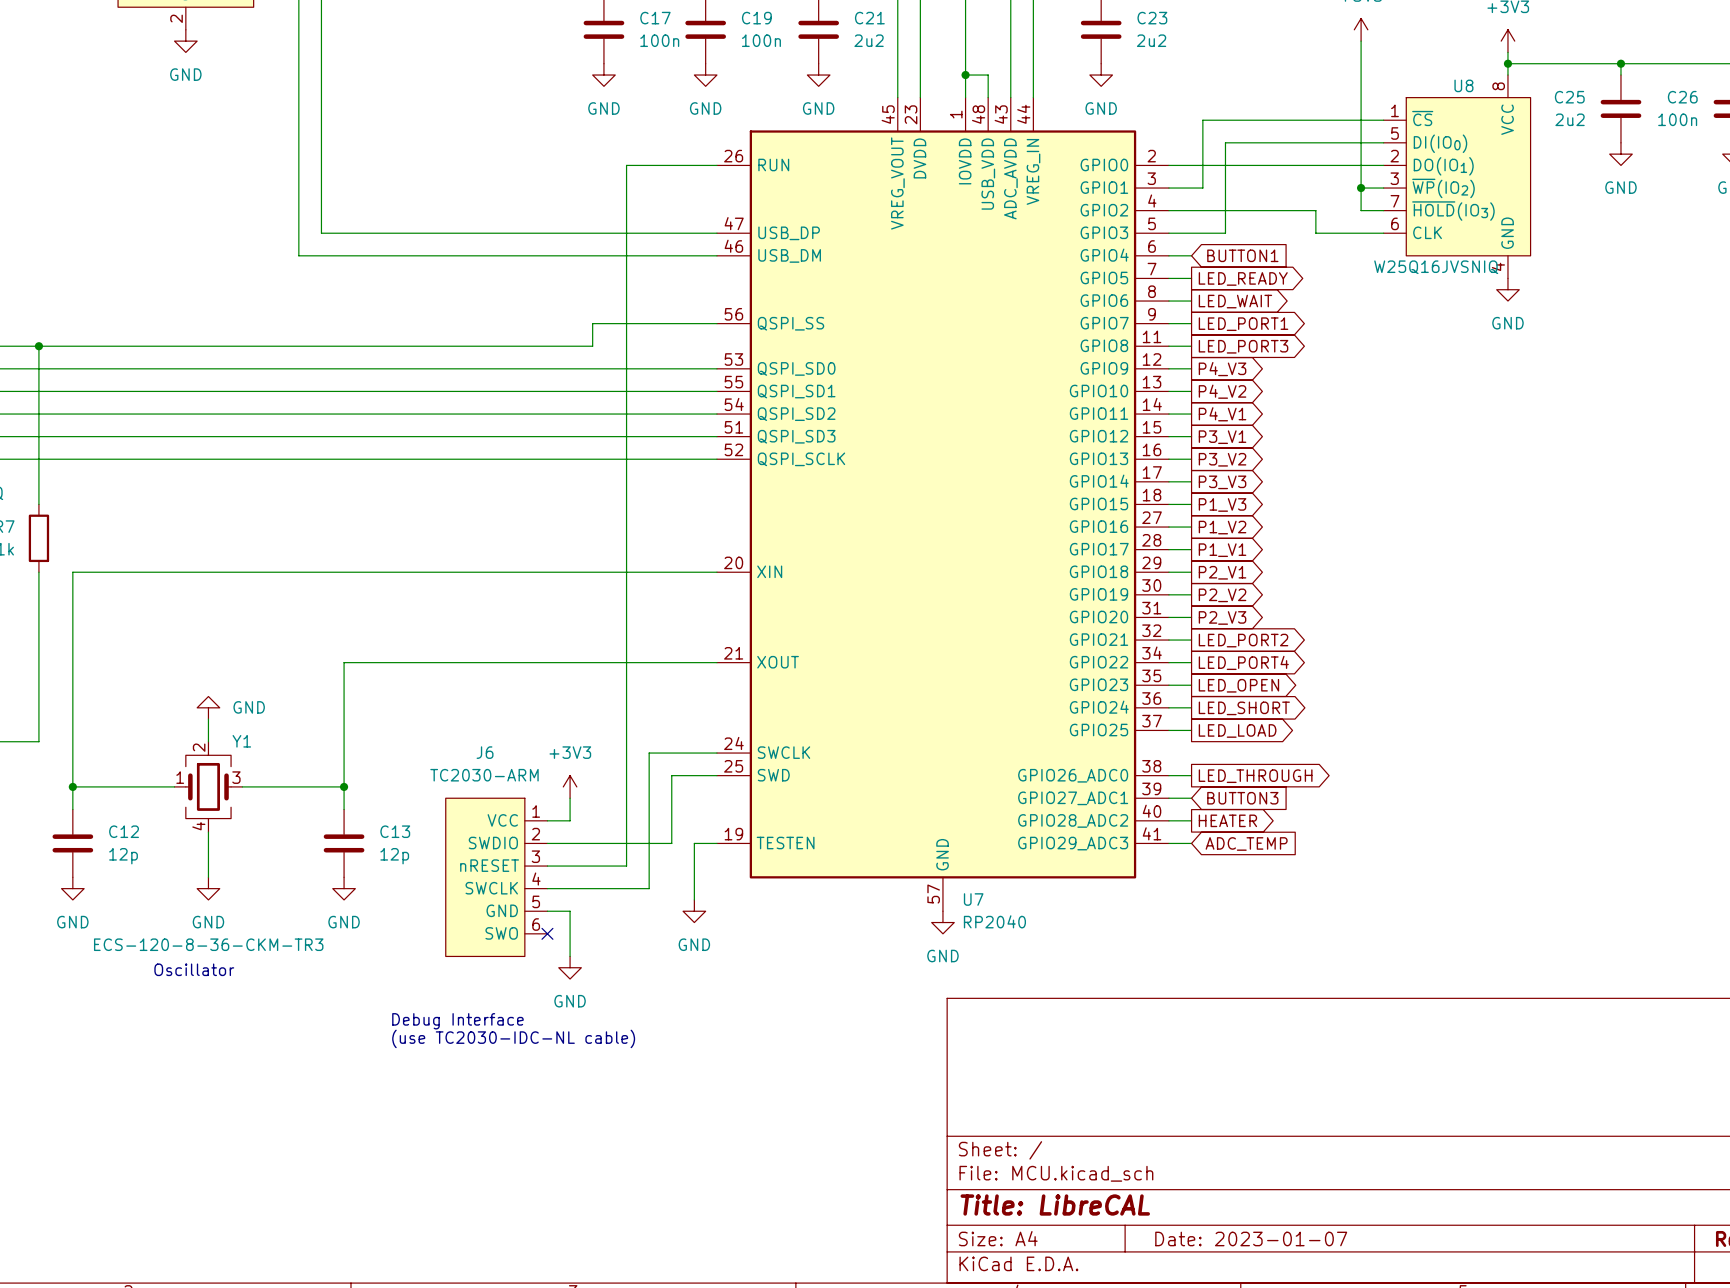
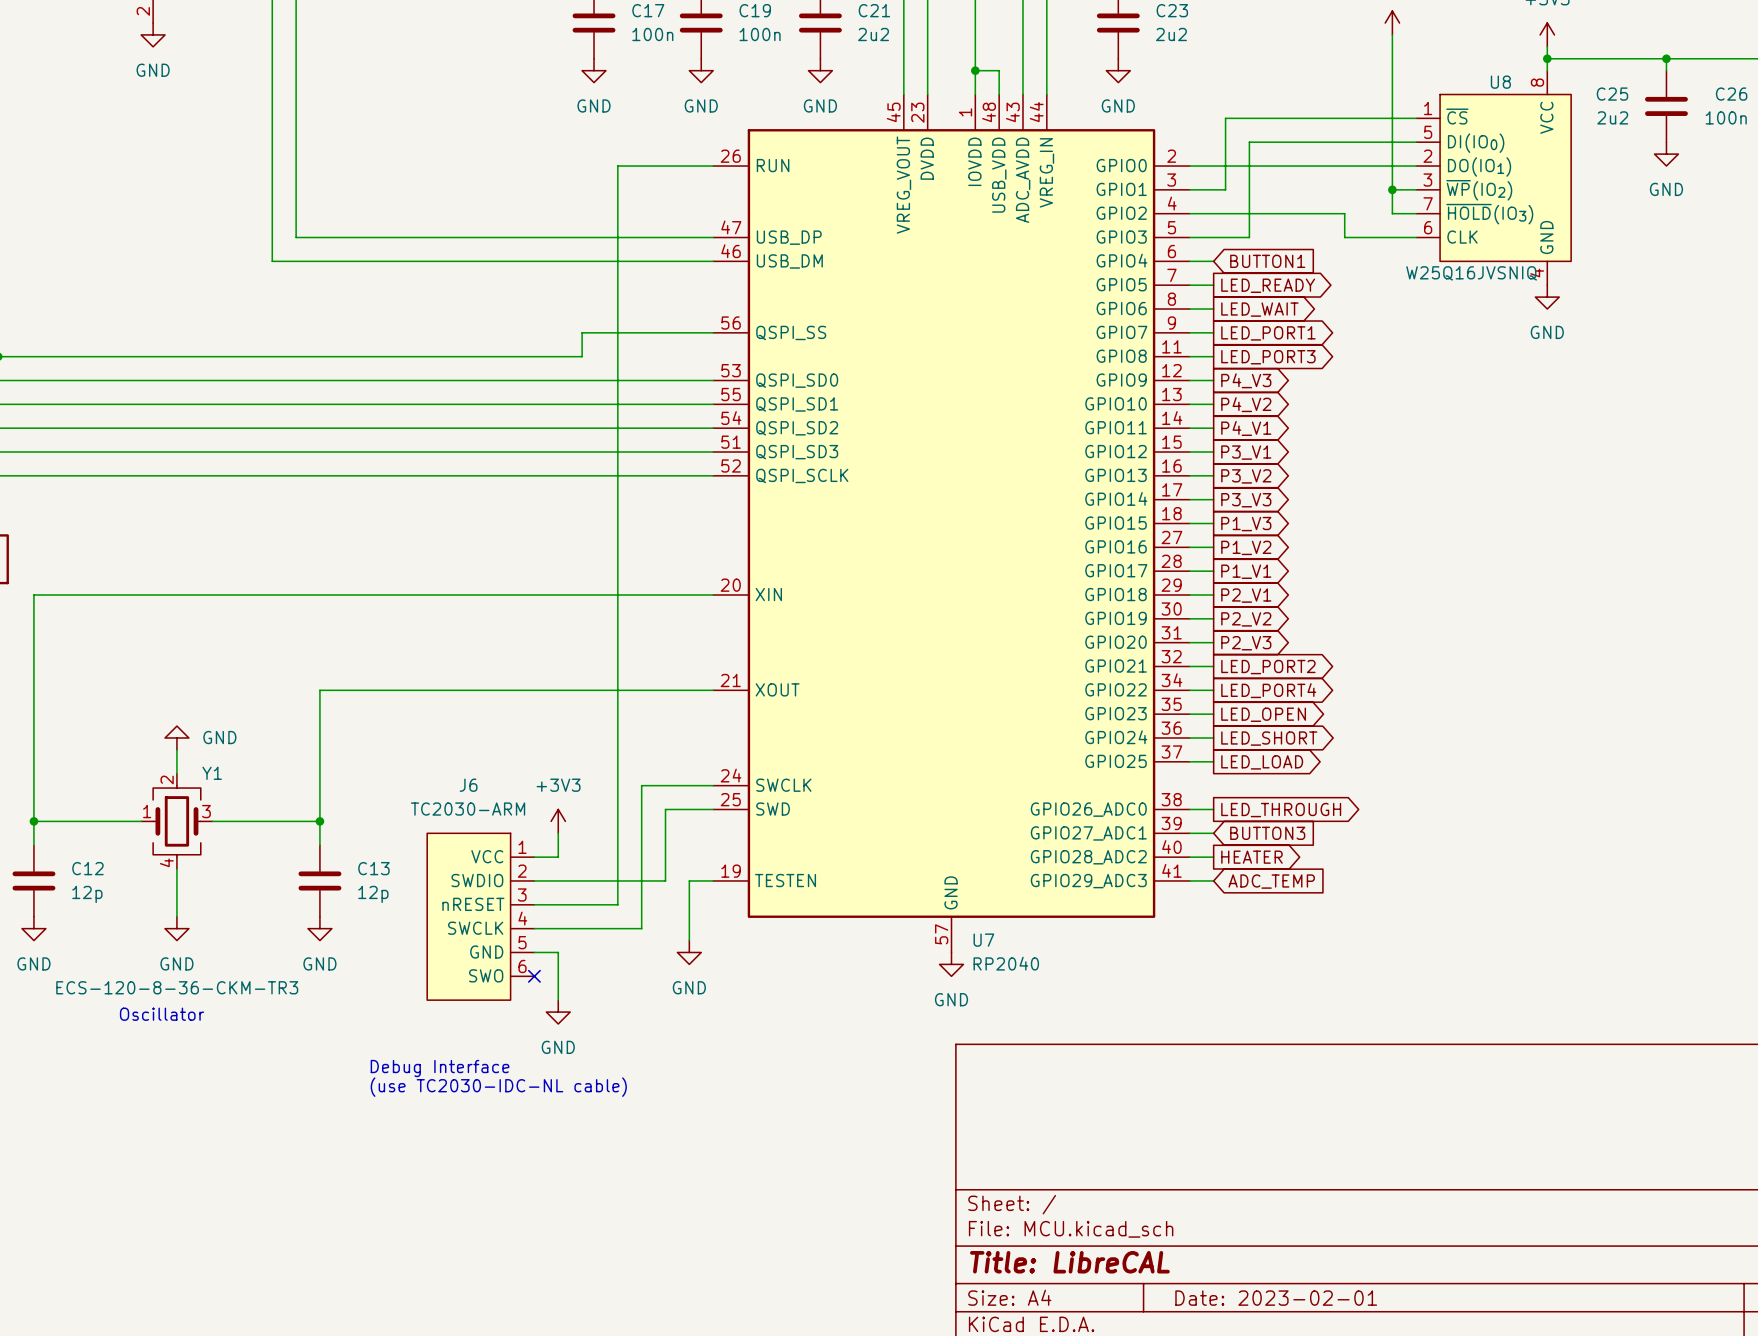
title block: Date: 2023-01-07 (1251, 1238) -> Date: 2023-02-01 (1276, 1298)

